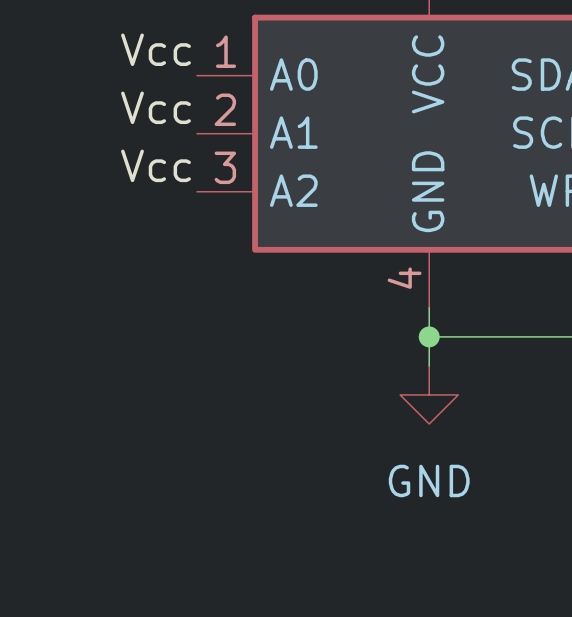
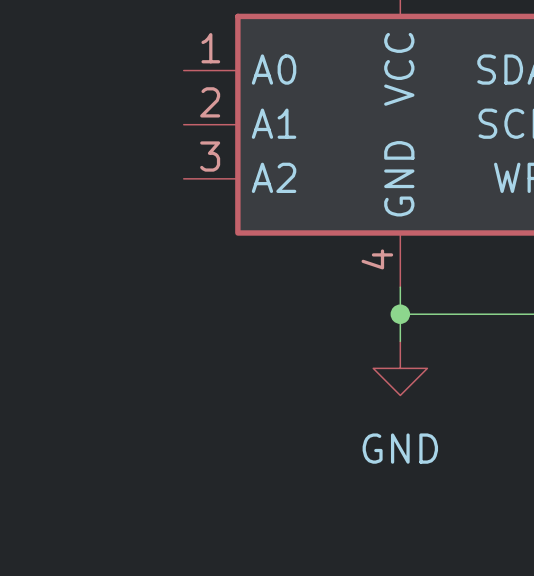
label: Vcc (156, 49) -> none
label: Vcc (156, 107) -> none
label: Vcc (156, 165) -> none

